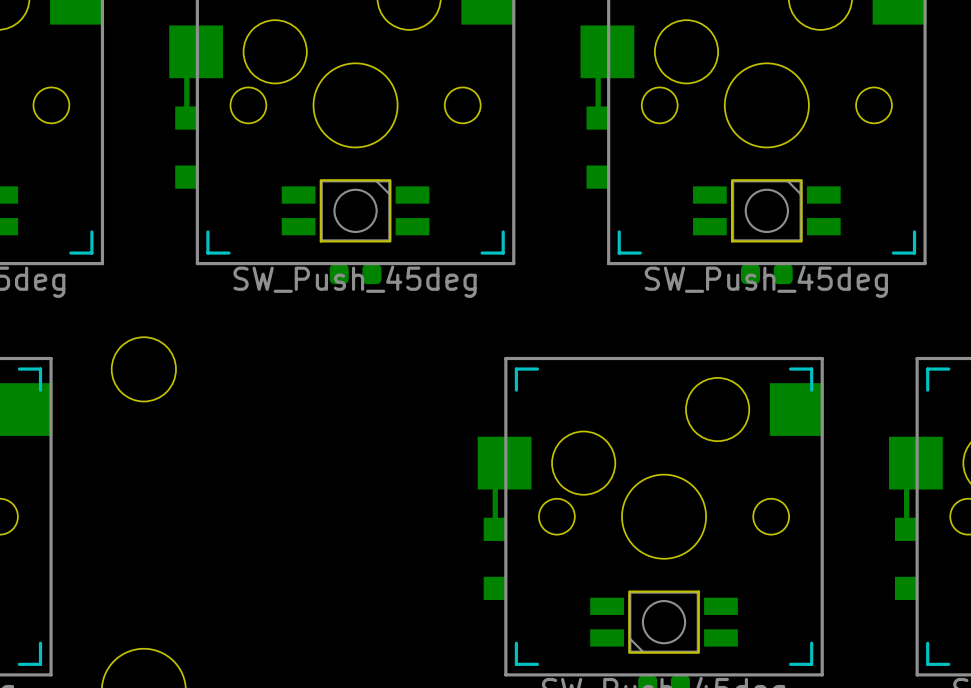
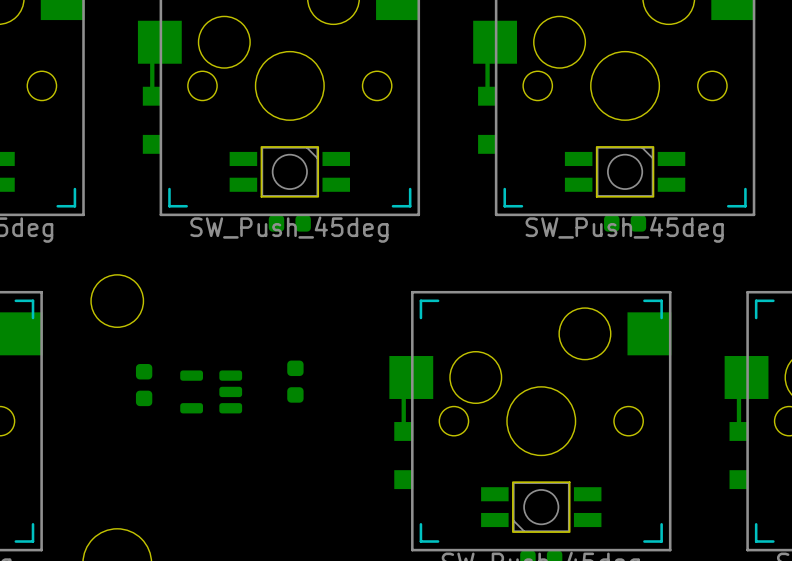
part: none -> (295, 381)
part: none -> (144, 385)
part: none -> (211, 391)

